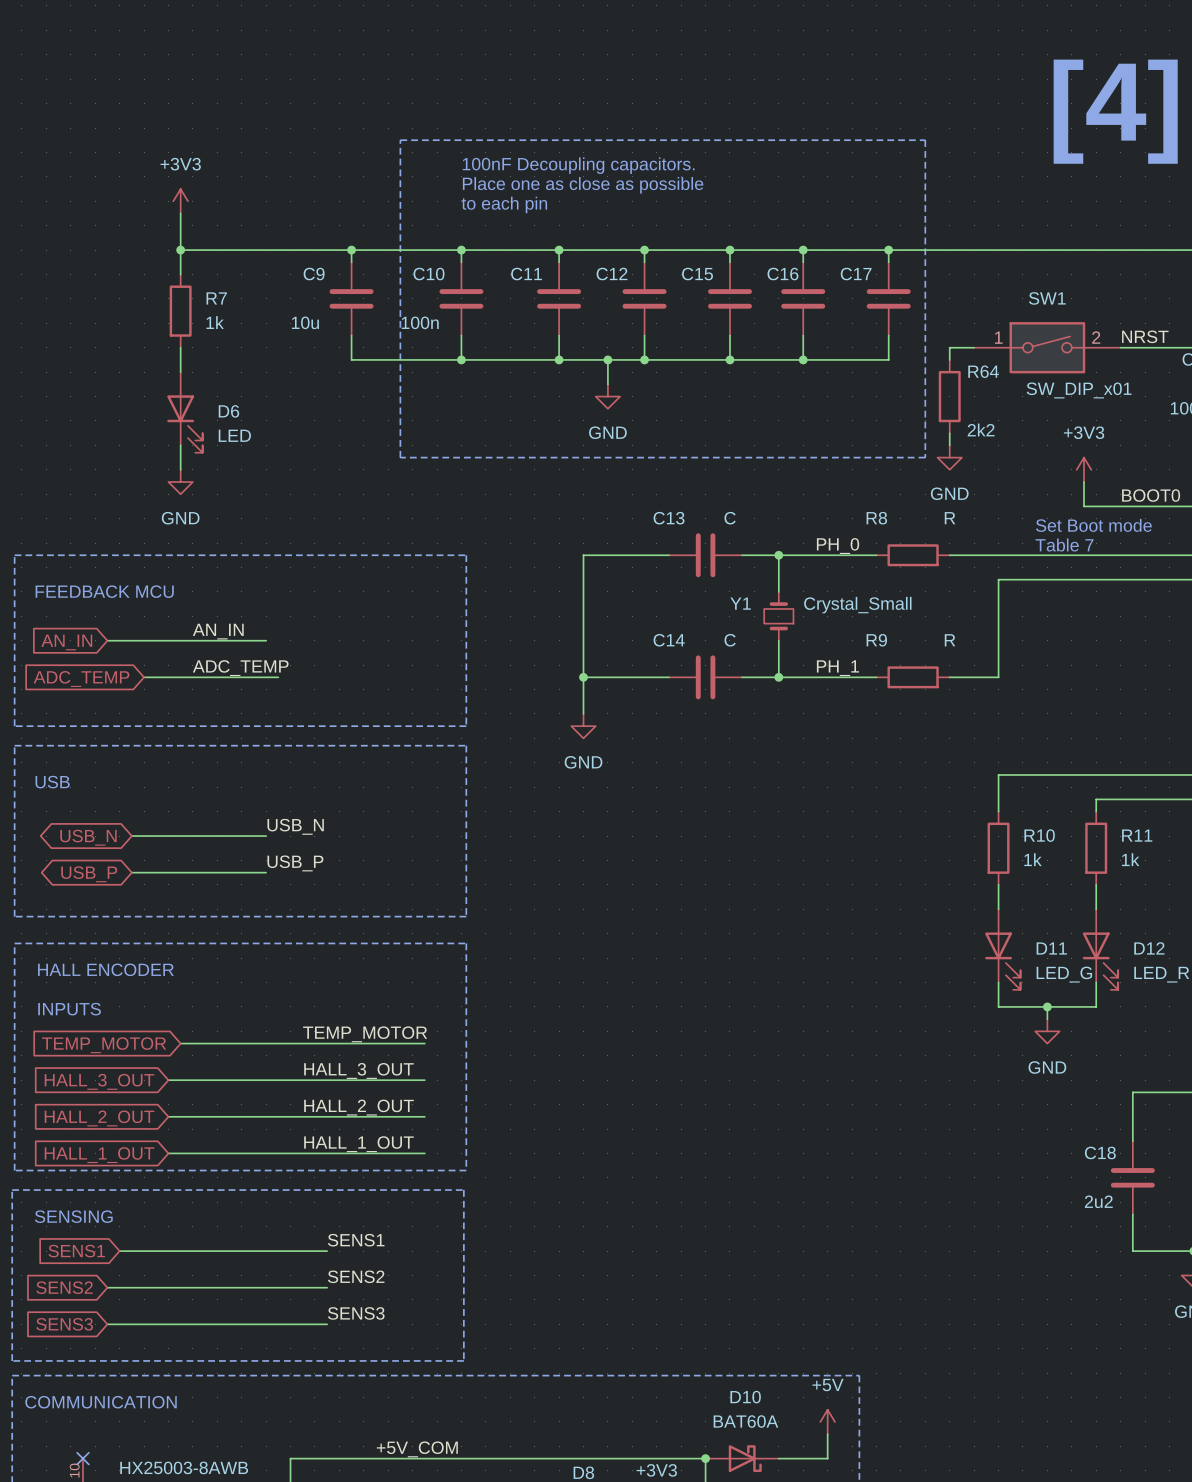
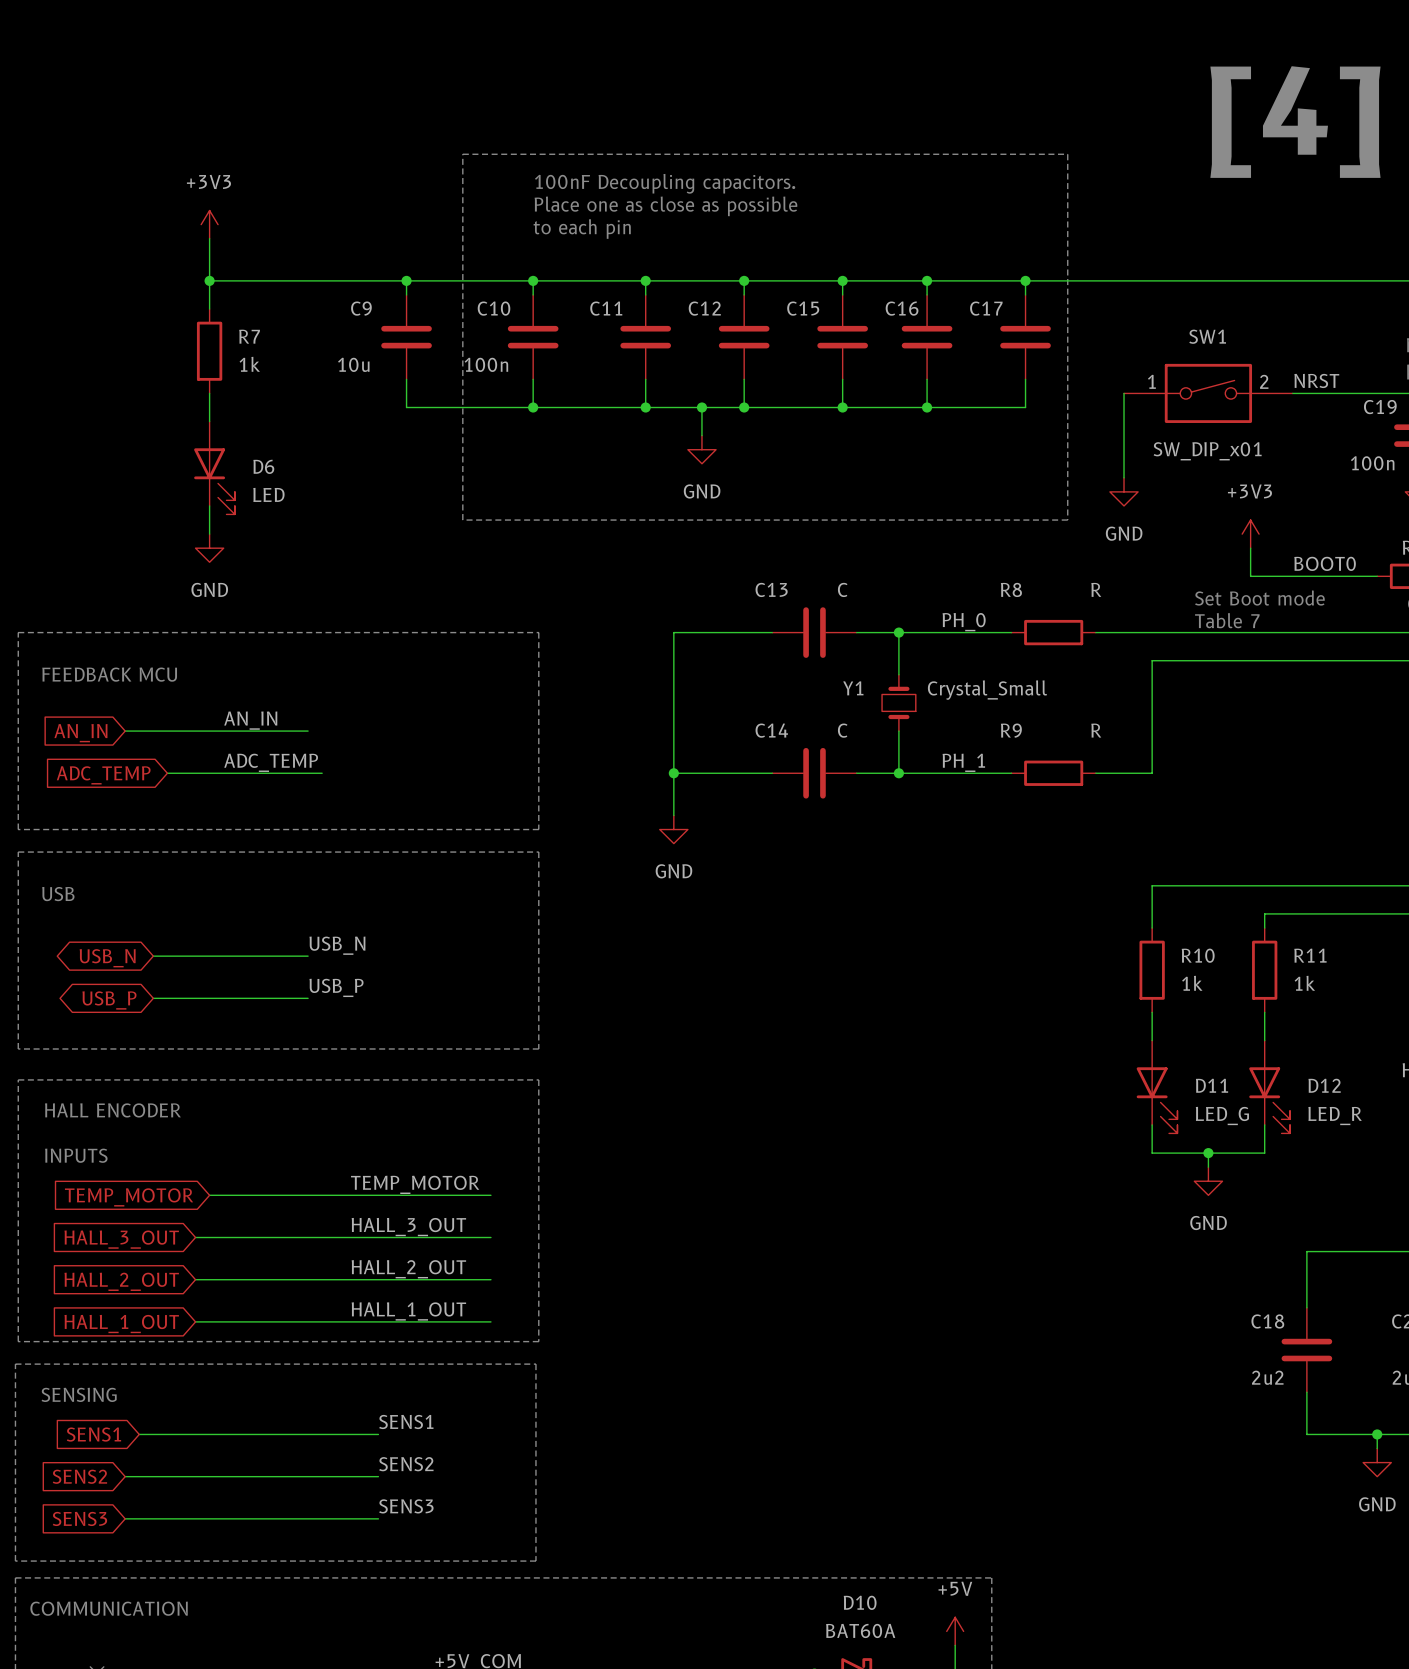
wire: (974, 347) (949, 347) (949, 359) -> (1124, 393) (1124, 477)
SW1 value position: SW_DIP_x01 (1079, 390) -> SW_DIP_x01 (1207, 451)
R64: 2k2 (949, 396) -> none
wire: (949, 433) (949, 445) -> none
power symbol position: GND (949, 457) -> GND (1124, 491)

